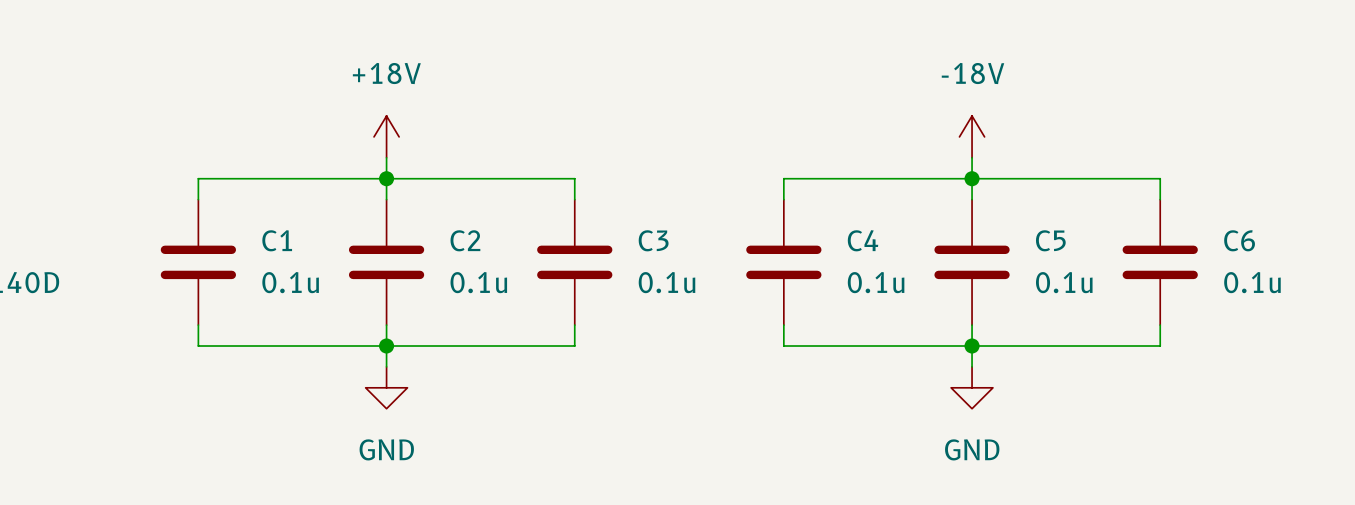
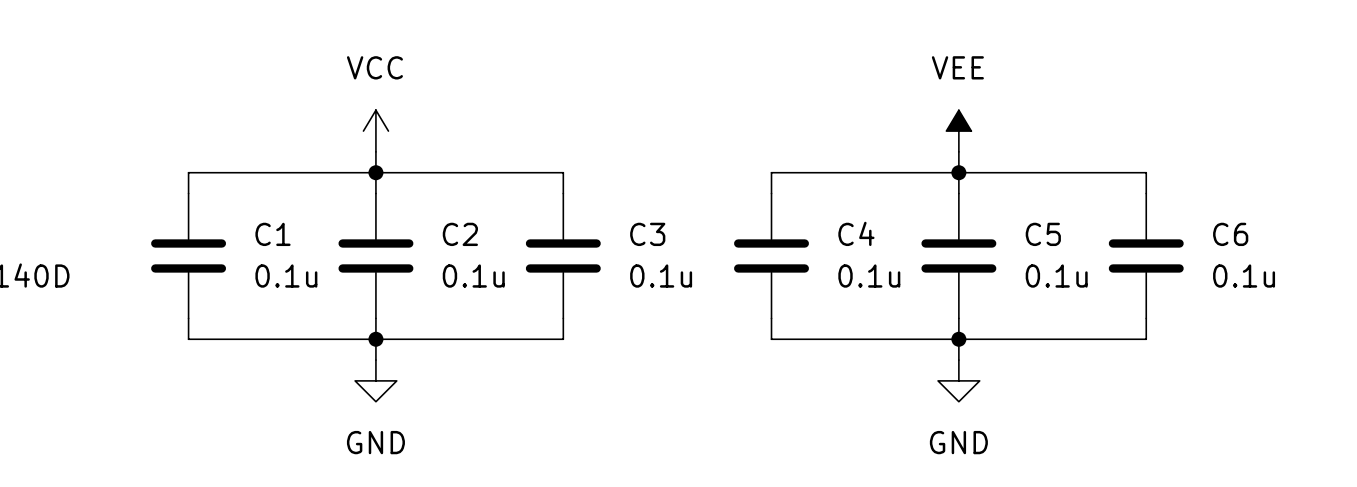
power symbol: +18V (386, 136) -> VCC (375, 131)
power symbol: -18V (972, 136) -> VEE (958, 131)

